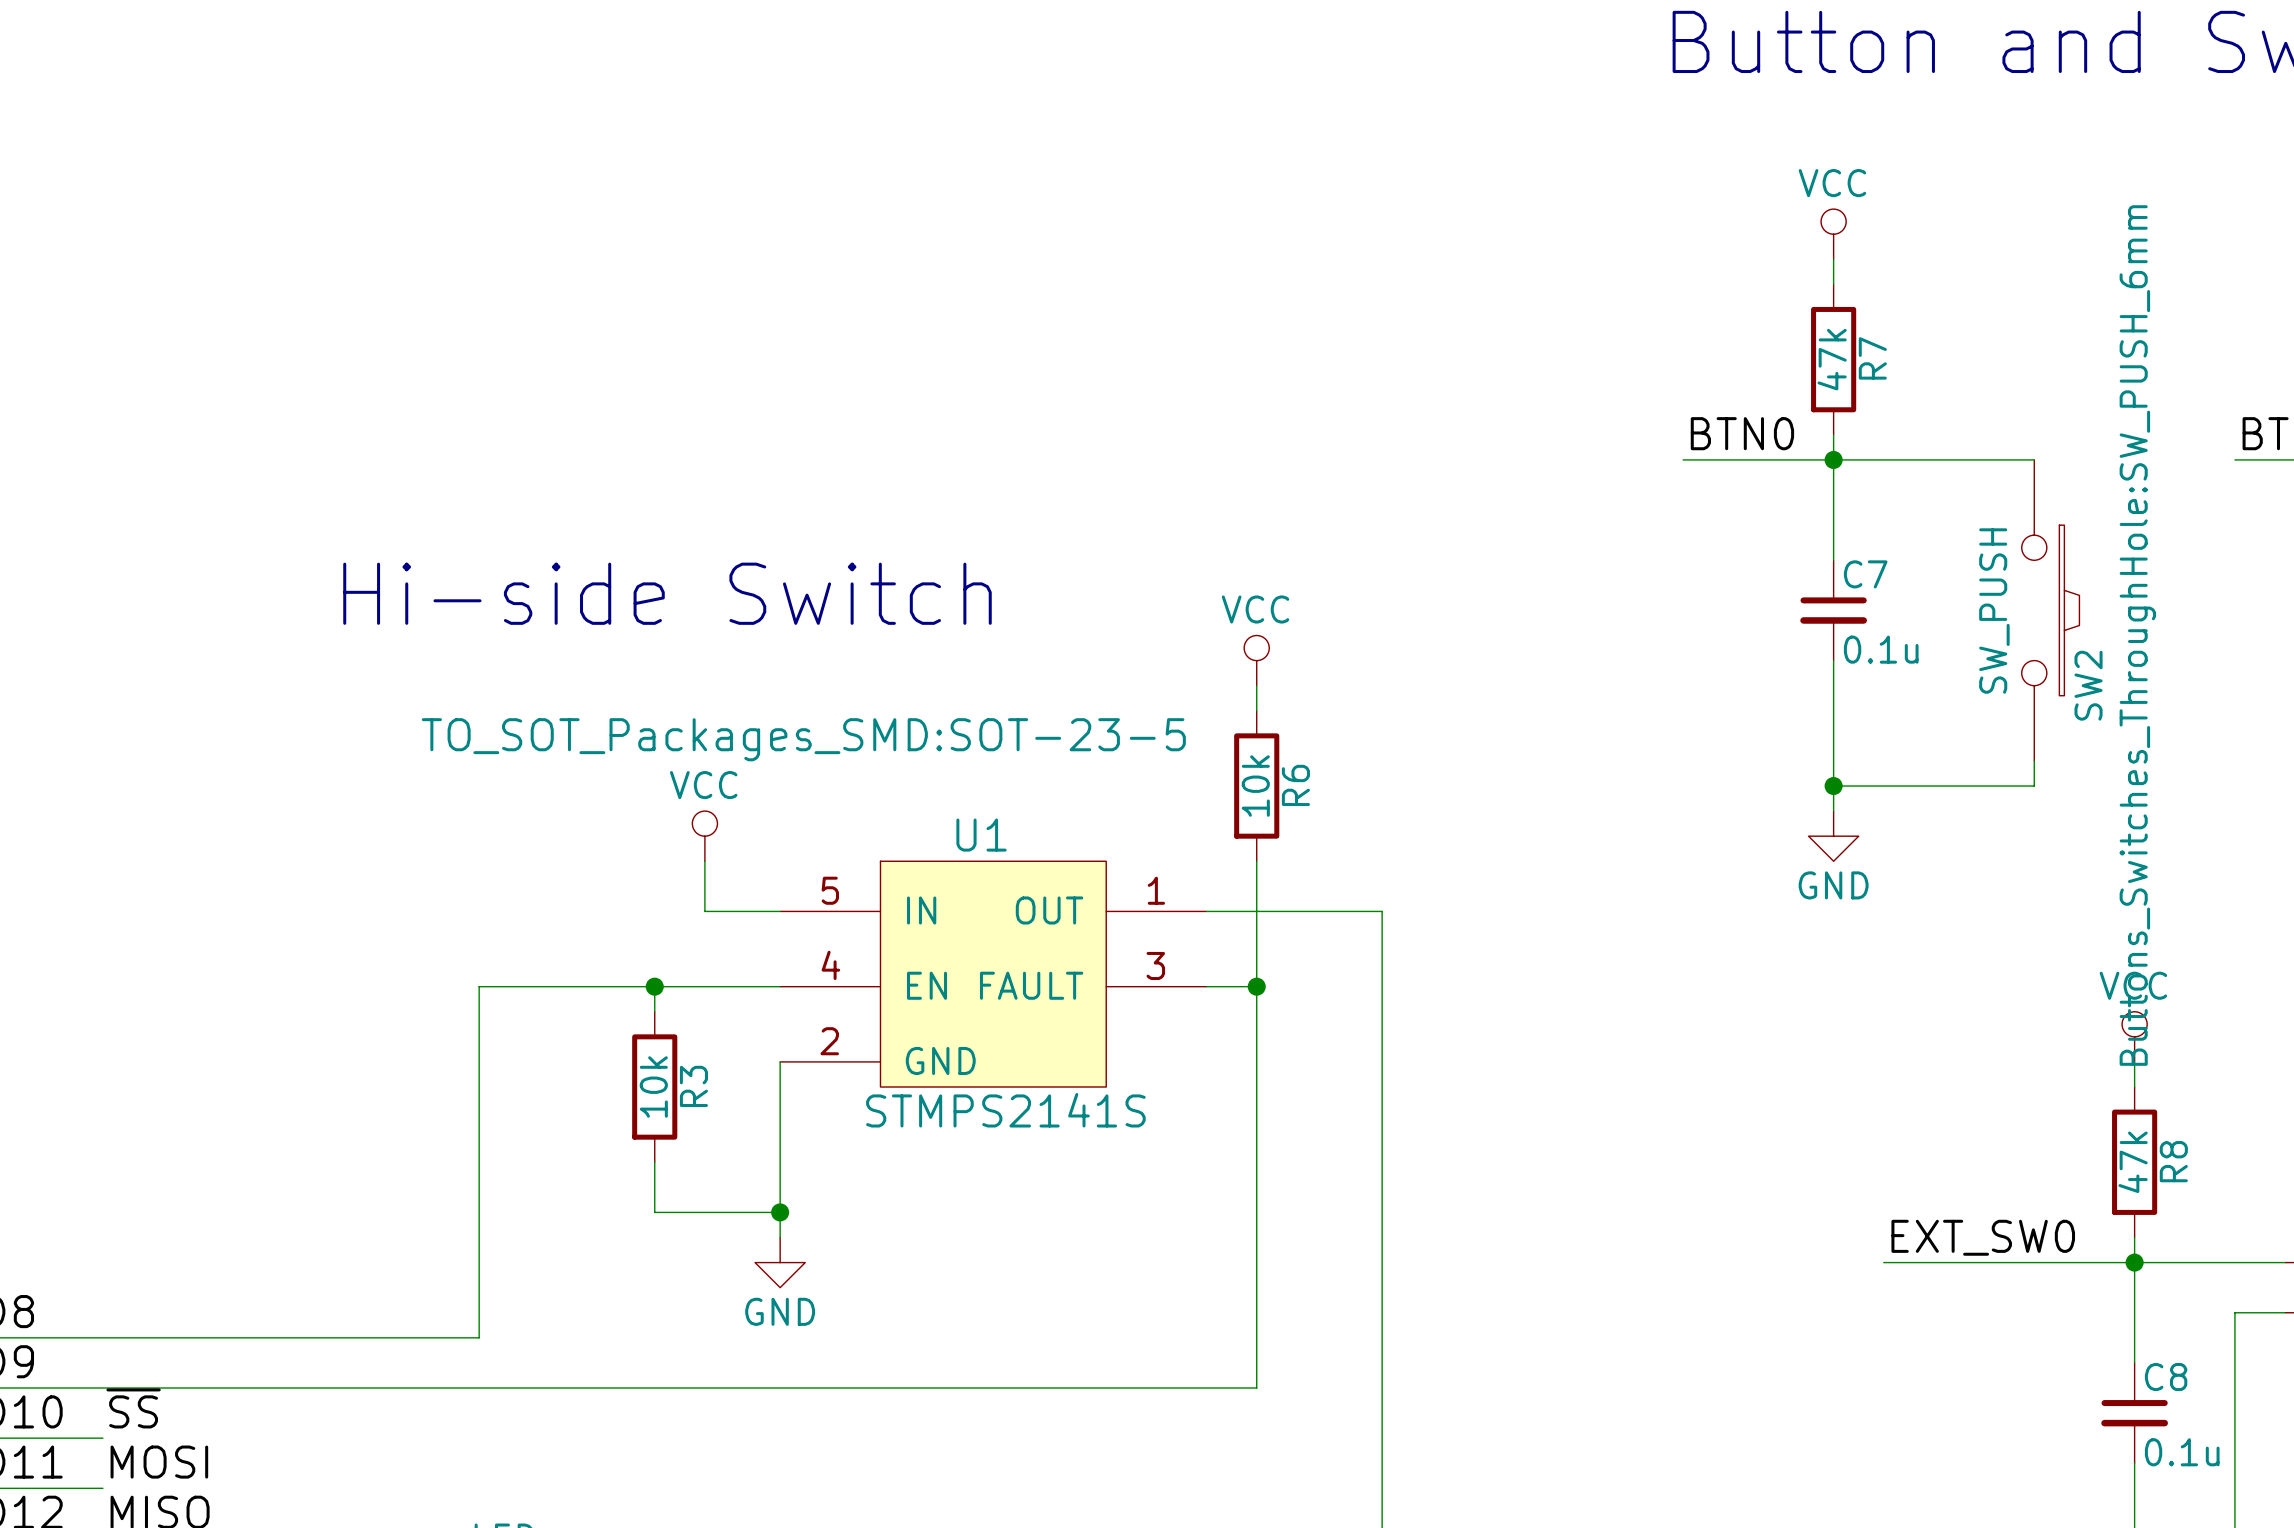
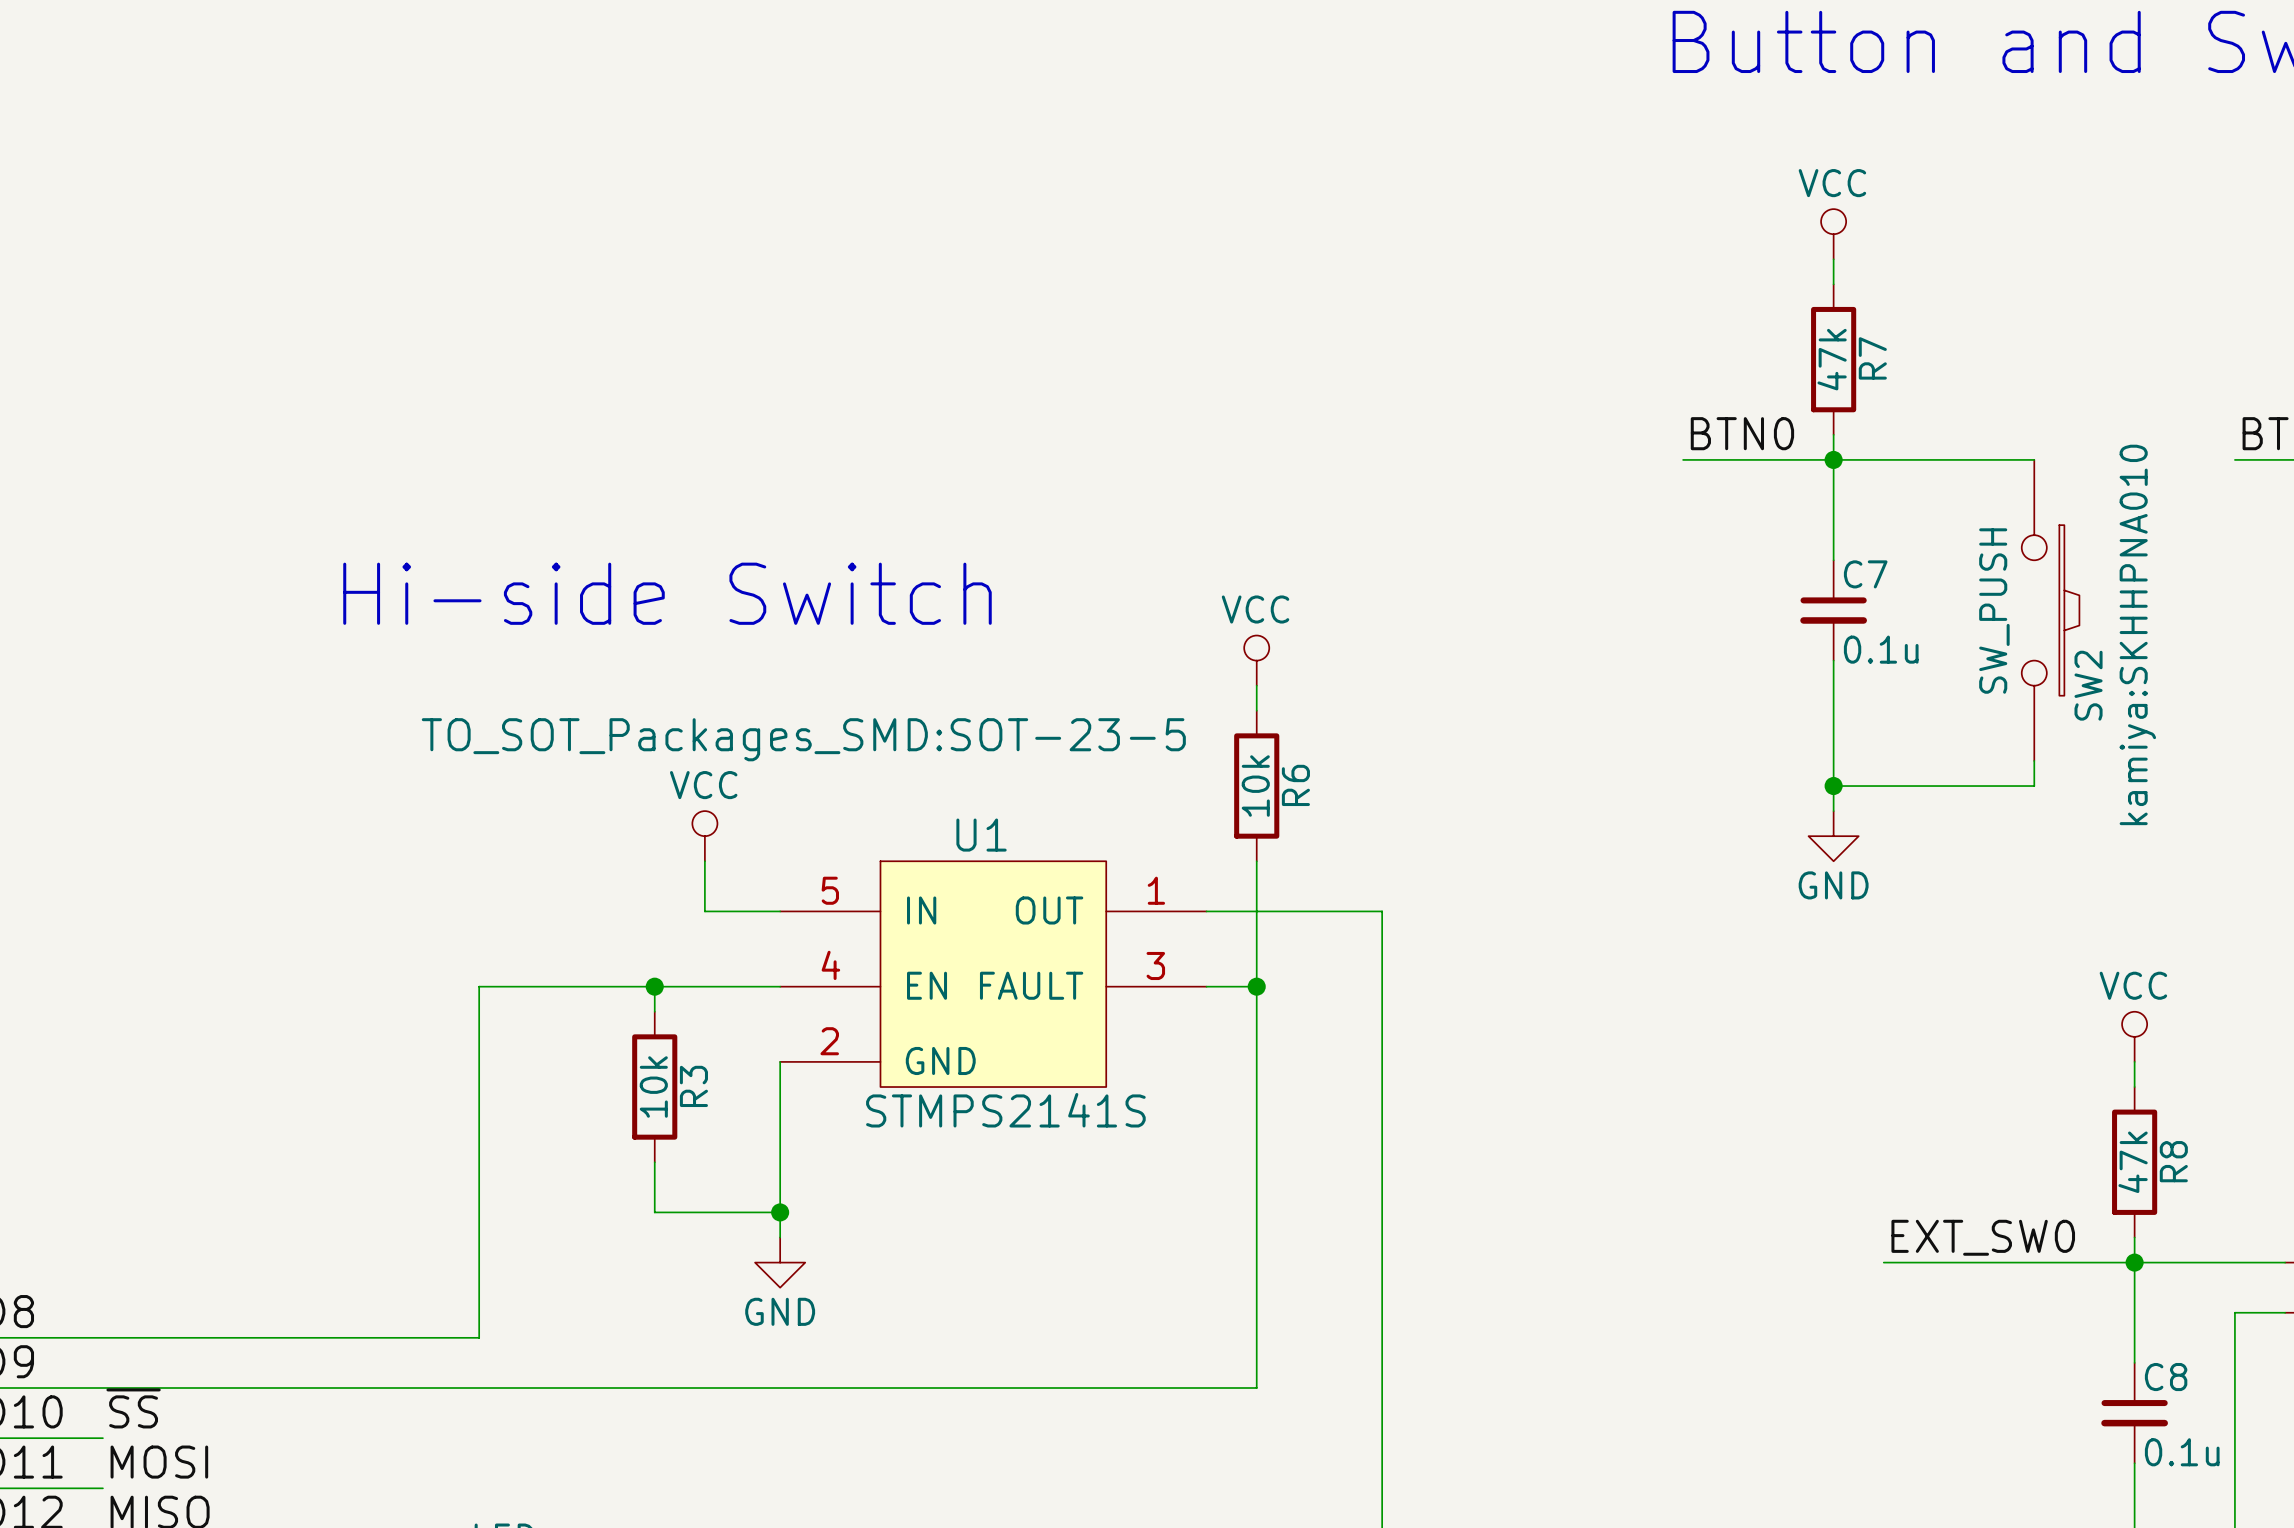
SW2 text: Buttons_Switches_ThroughHole:SW_PUSH_6mm (2137, 635) -> kamiya:SKHHPNA010 (2137, 634)

